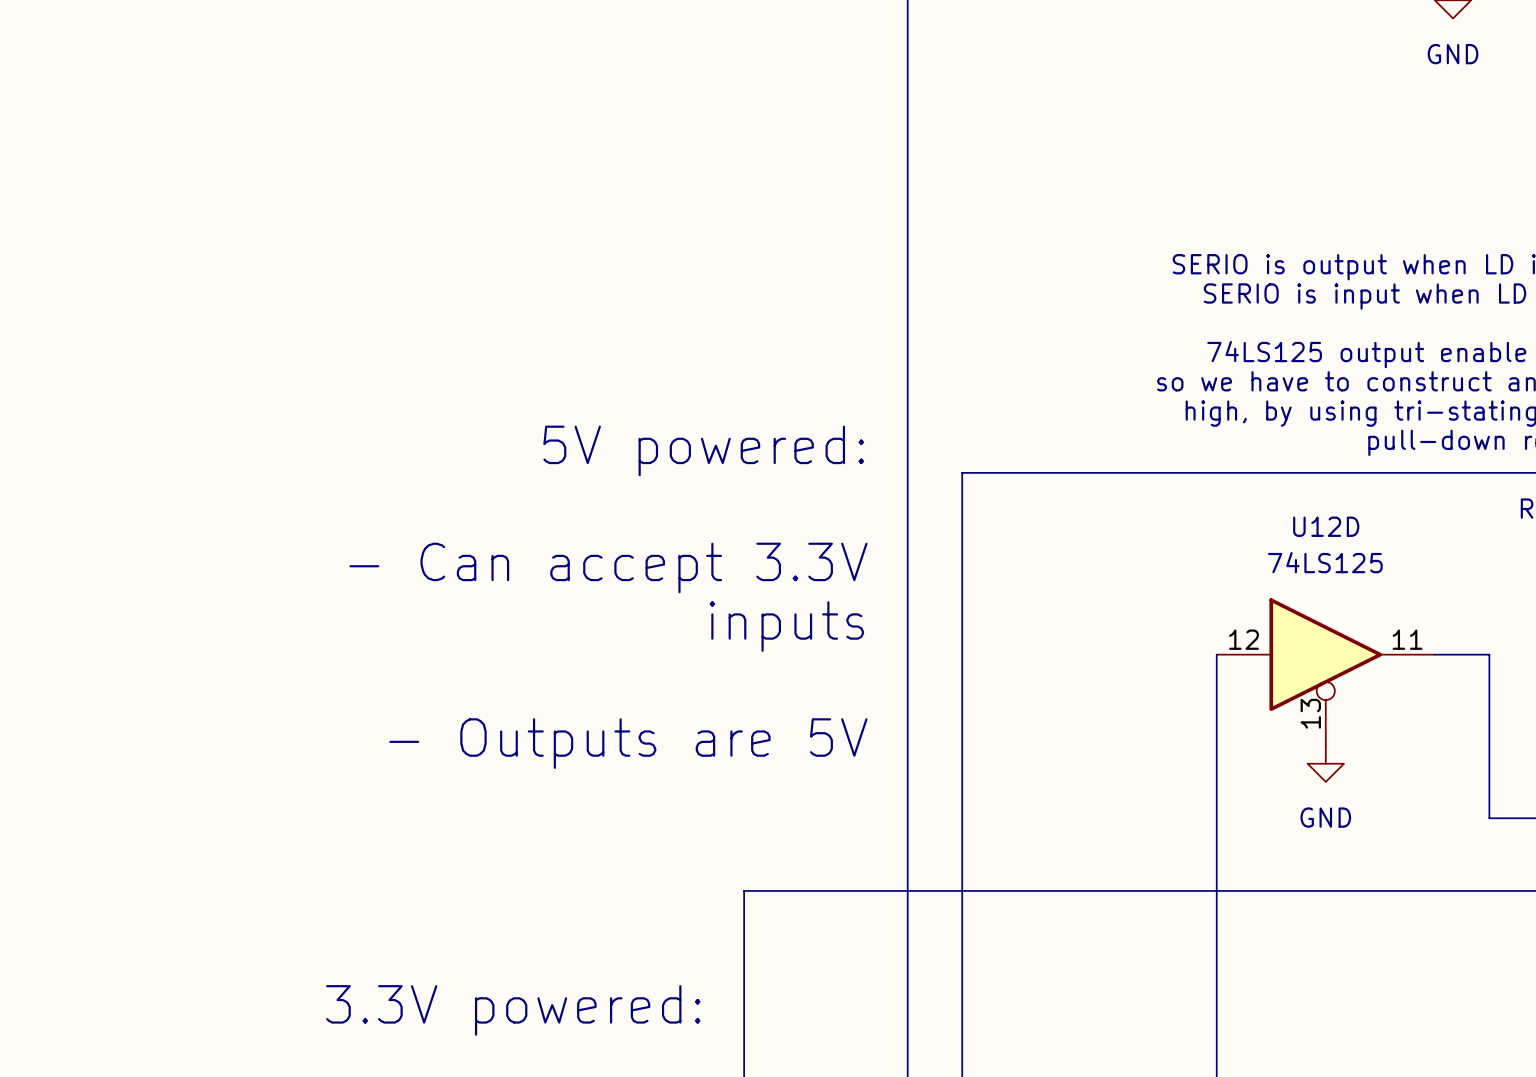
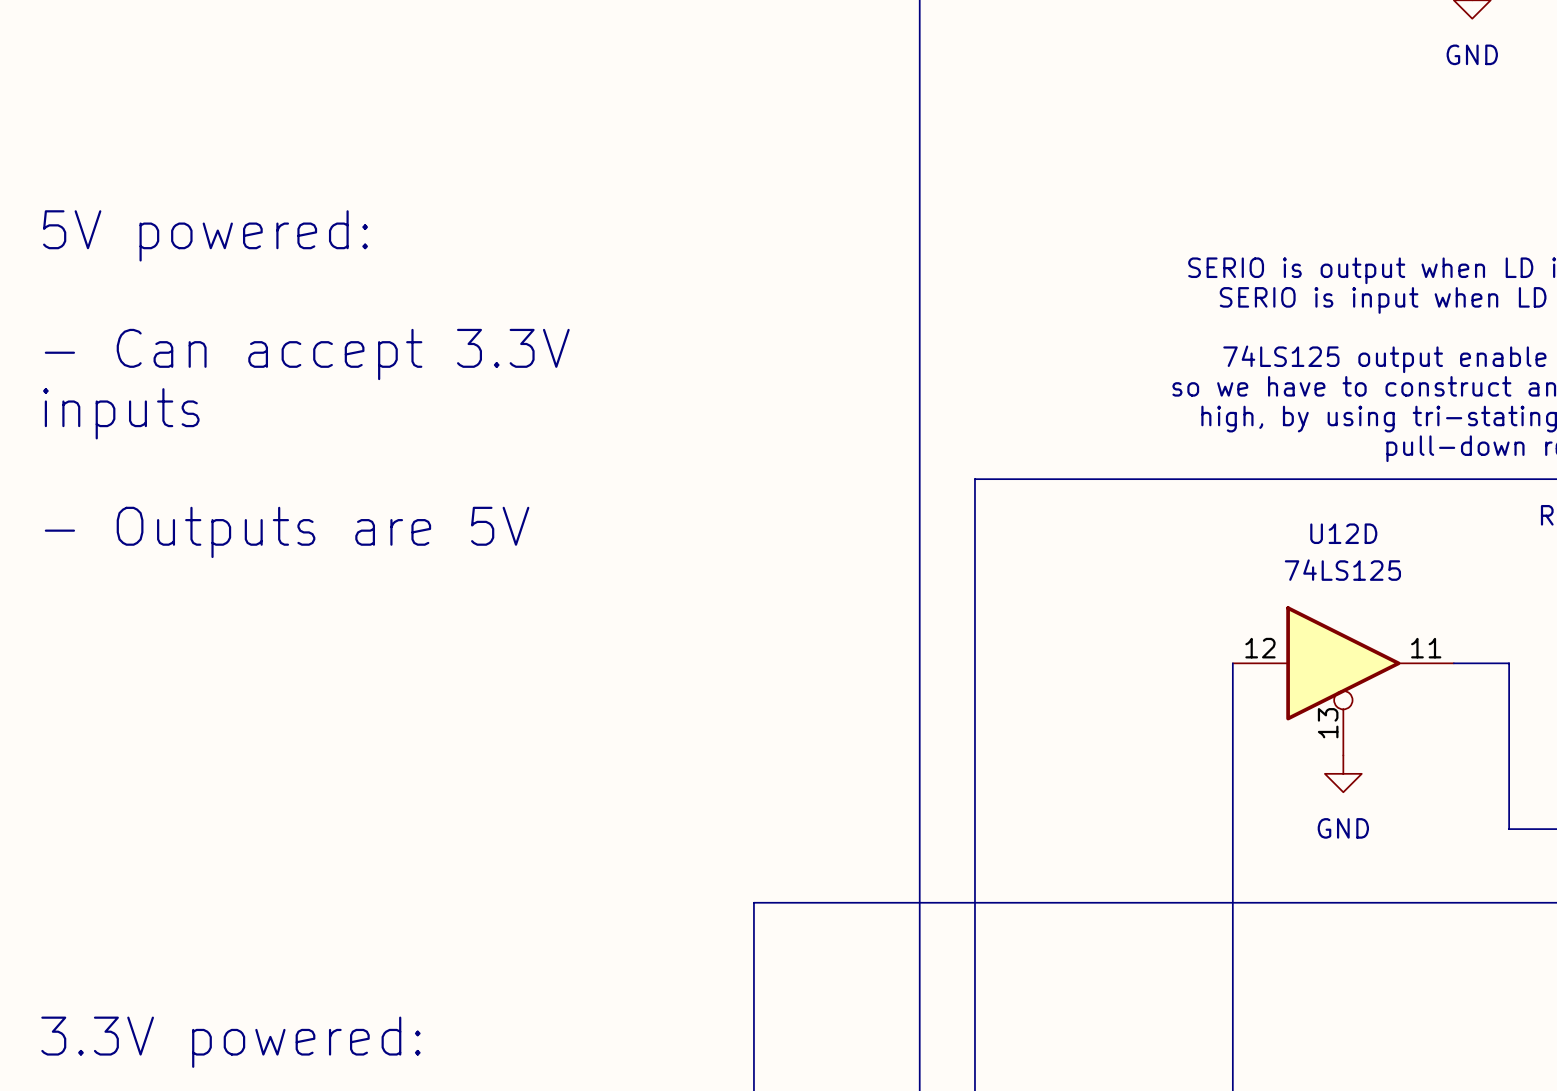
text: none -> 5V powered: (205, 235)
text: none -> - Can accept 3.3V (307, 354)
text: none -> inputs (121, 413)
text: 5V powered: (703, 450) -> none
text: none -> - Outputs are 5V (287, 532)
text: - Can accept 3.3V (608, 567) -> none
text: inputs (786, 626) -> none
text: - Outputs are 5V (628, 743) -> none
text: 3.3V powered: (513, 1010) -> none
text: none -> 3.3V powered: (230, 1042)

